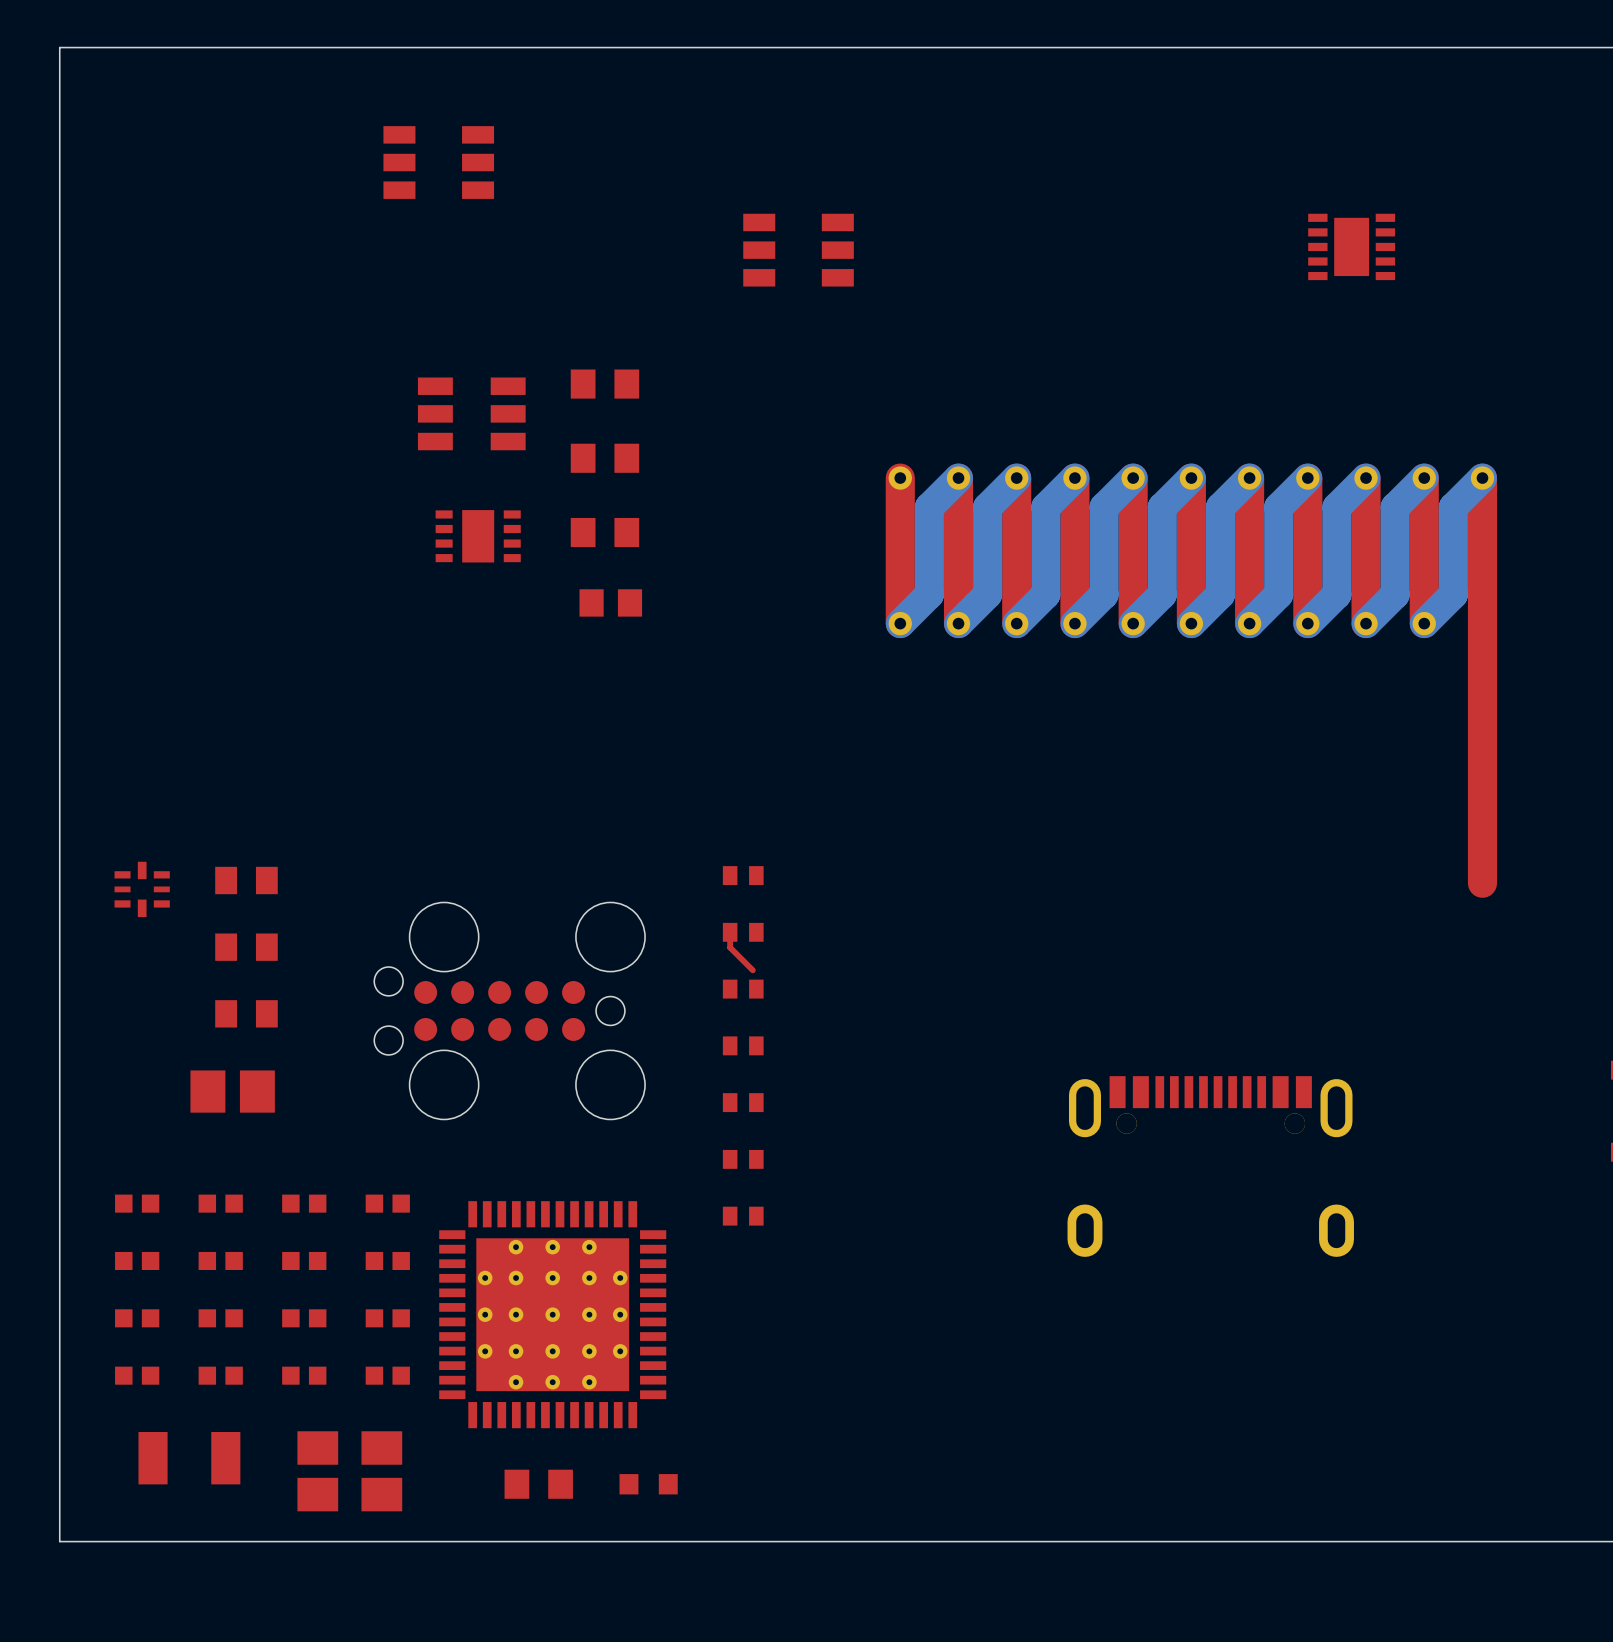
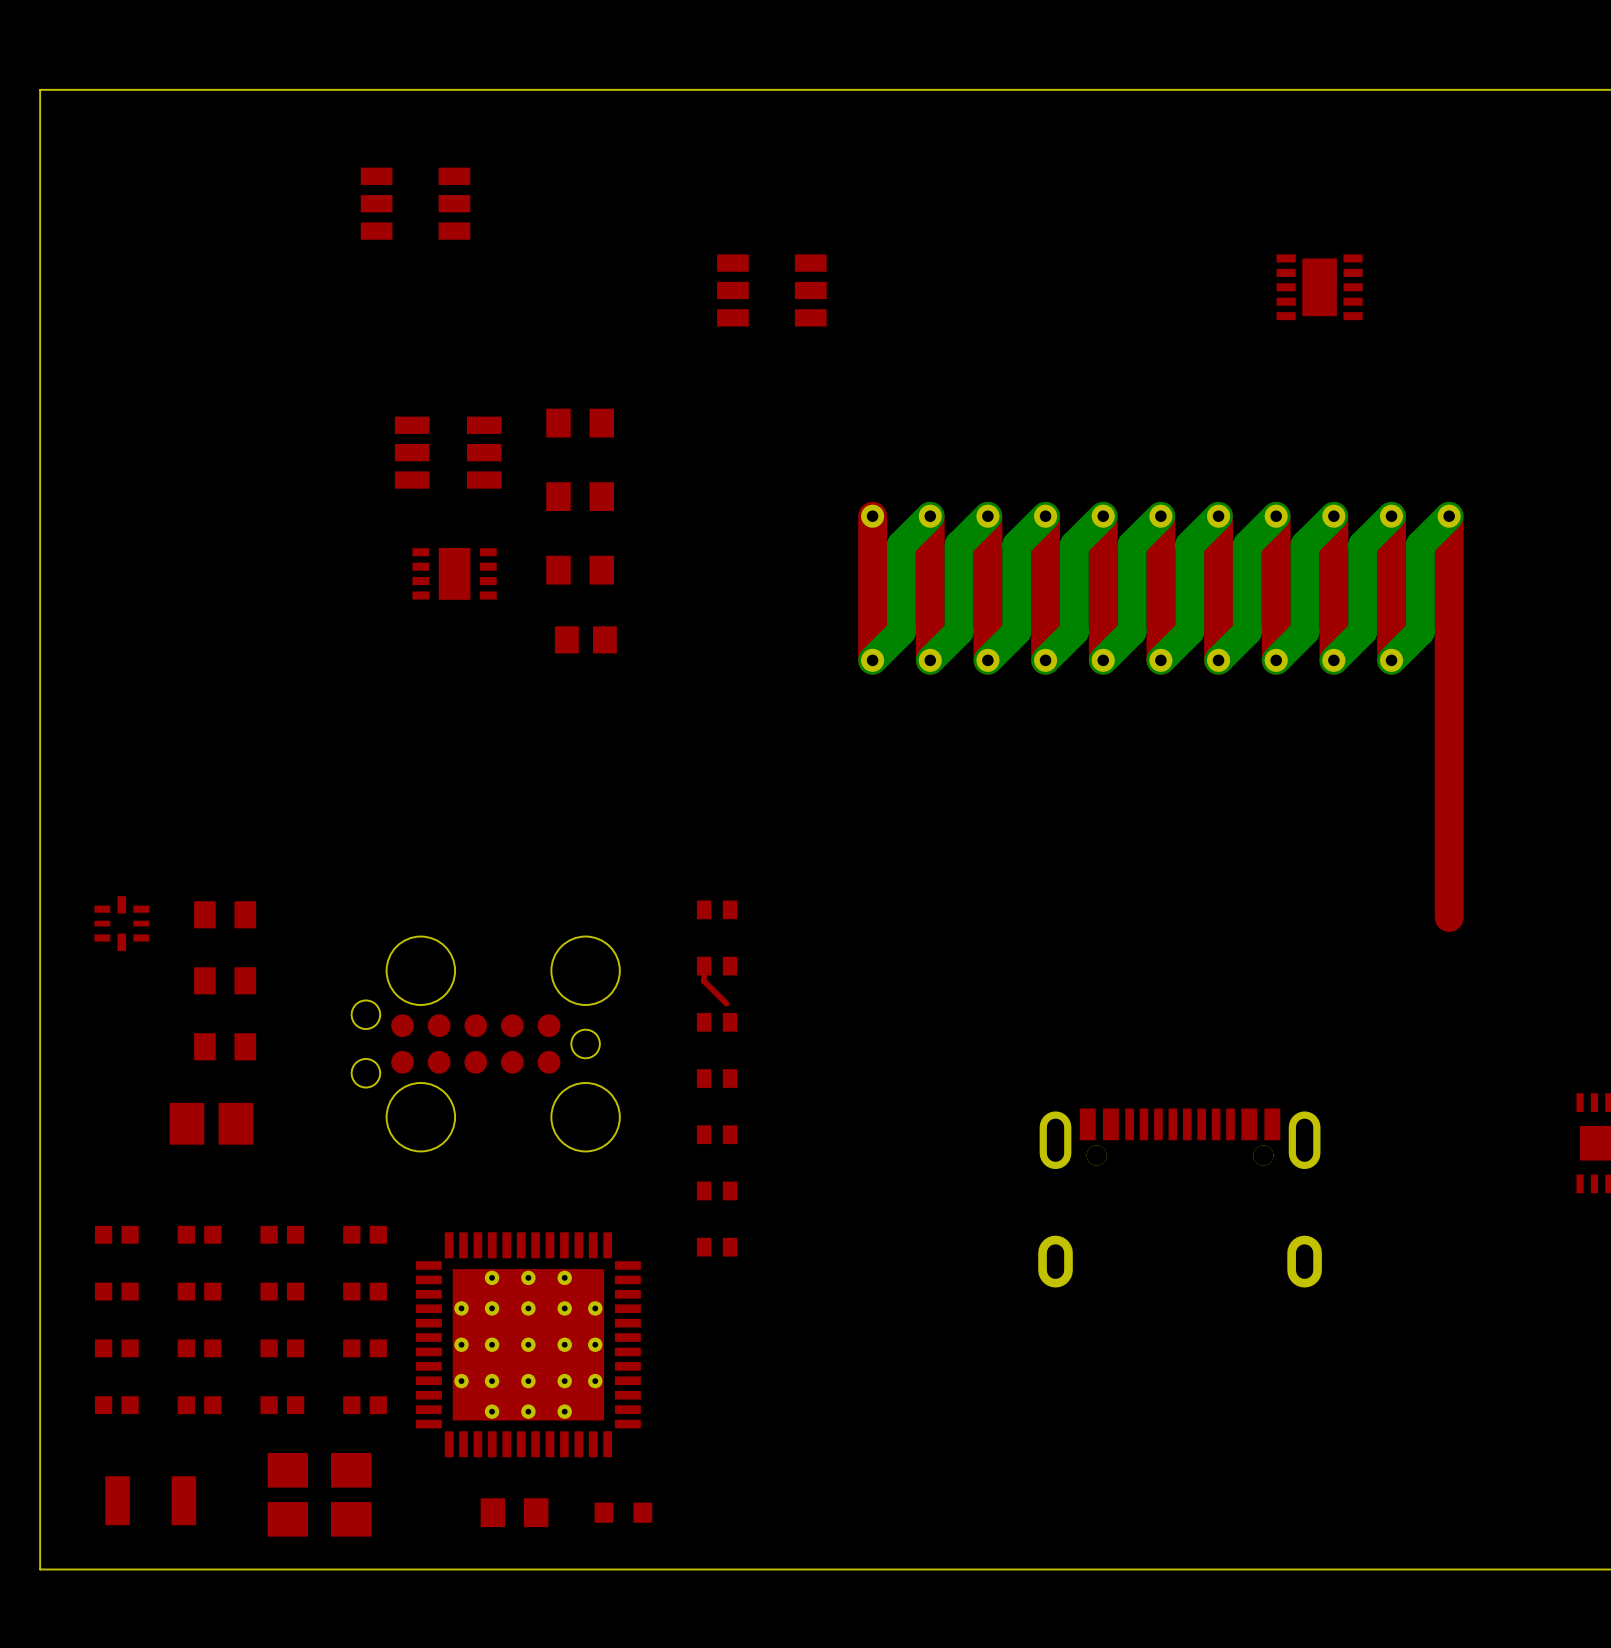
part footprint: [138, 1431, 241, 1485] -> [105, 1476, 197, 1526]
part footprint: [297, 1431, 403, 1512] -> [267, 1453, 372, 1537]

